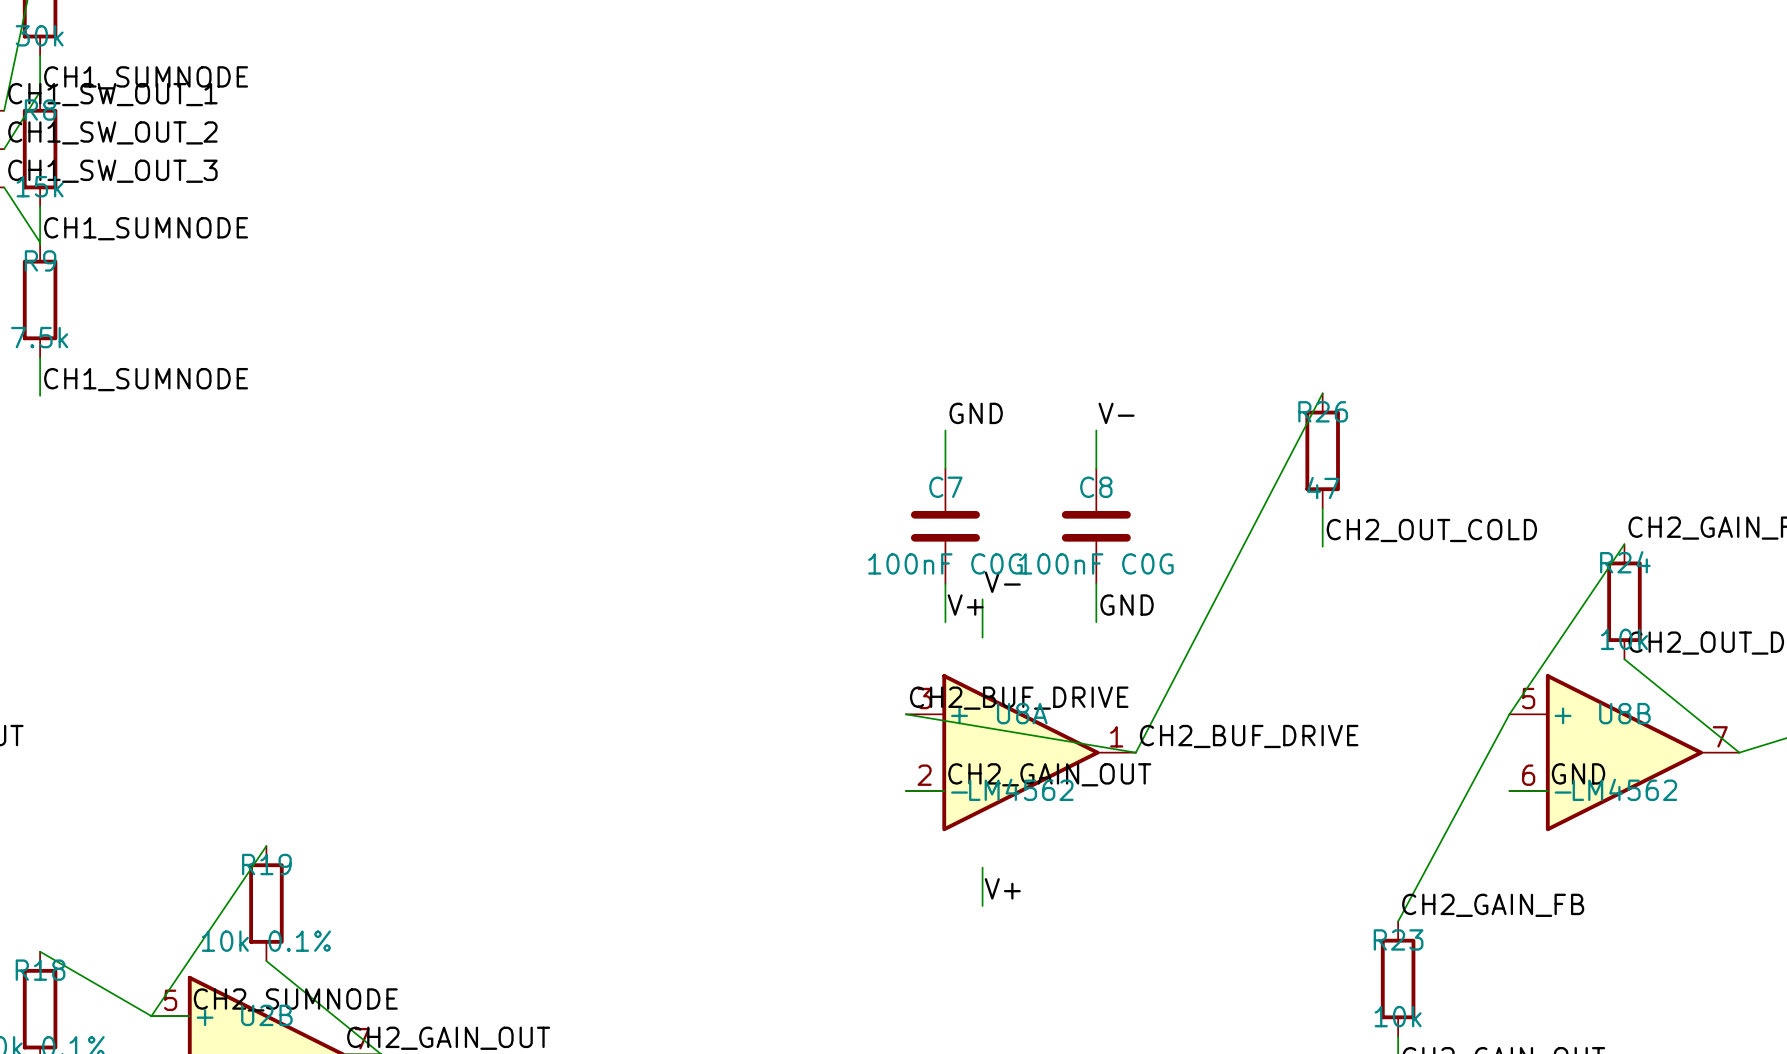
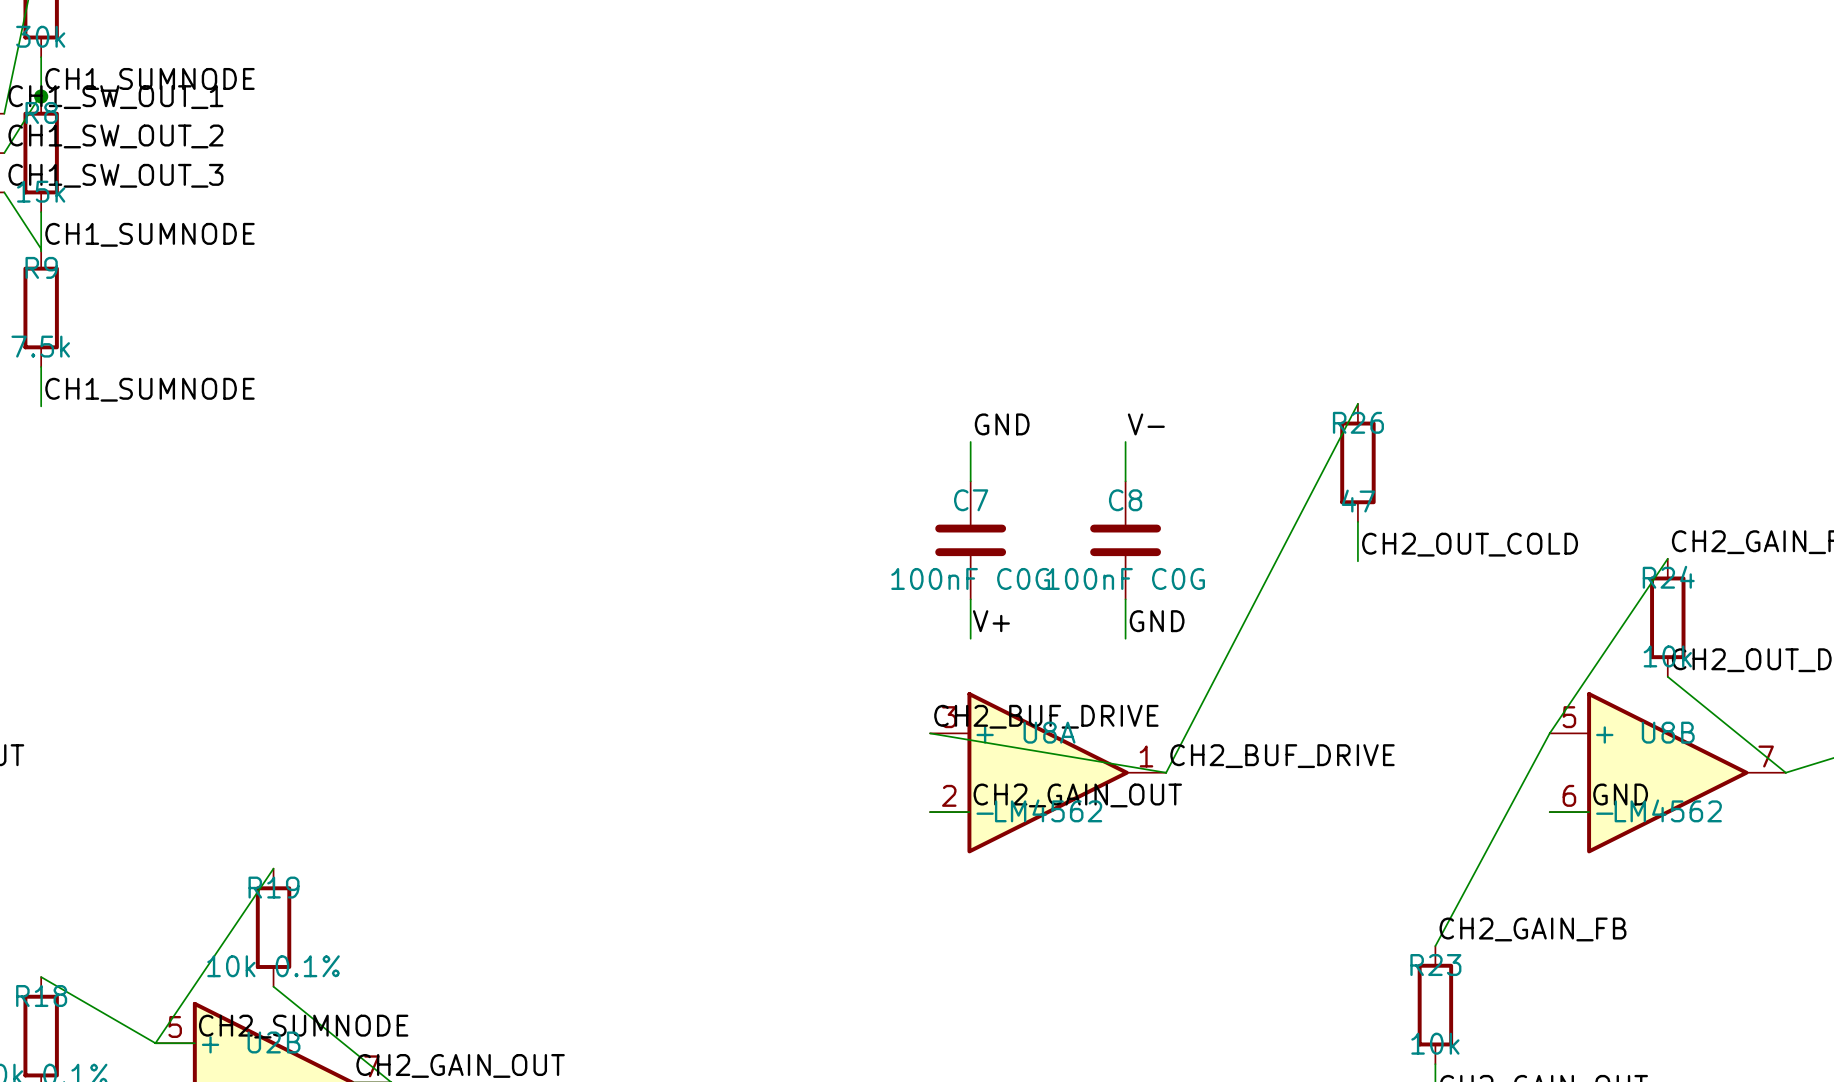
junction: none -> (41, 96)
label: V- (1002, 582) -> none
wire: (982, 599) (982, 637) -> none
wire: (982, 867) (982, 905) -> none
label: V+ (1002, 888) -> none

